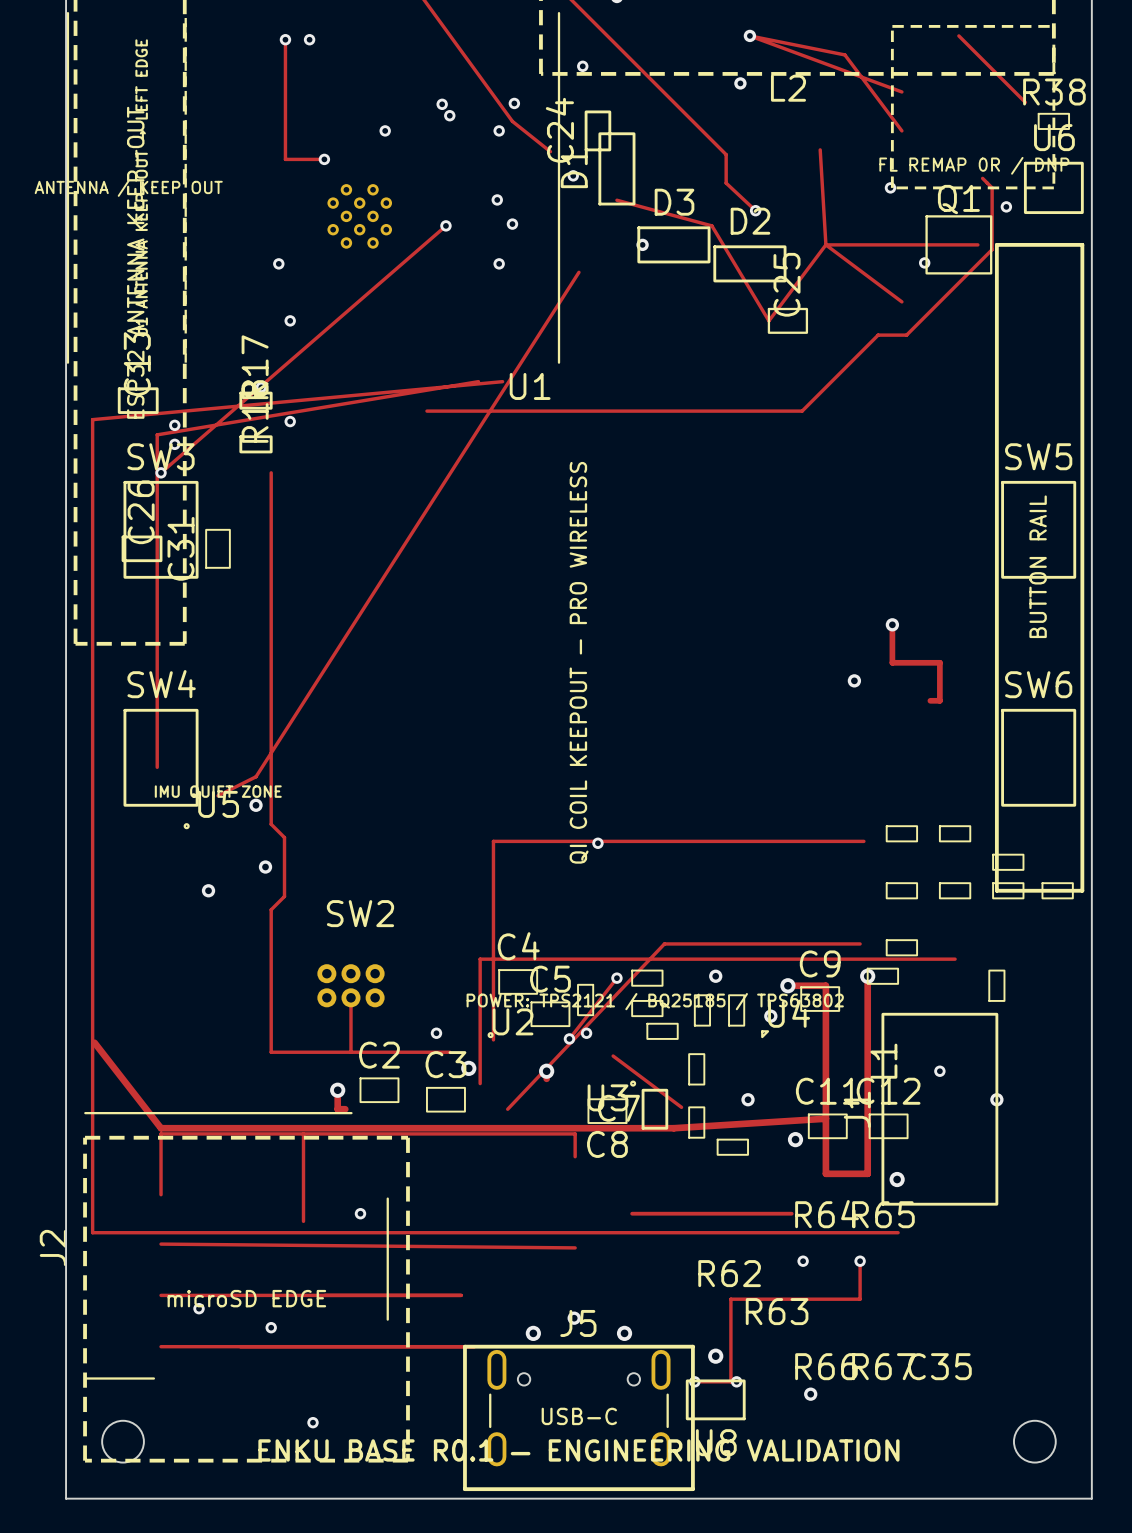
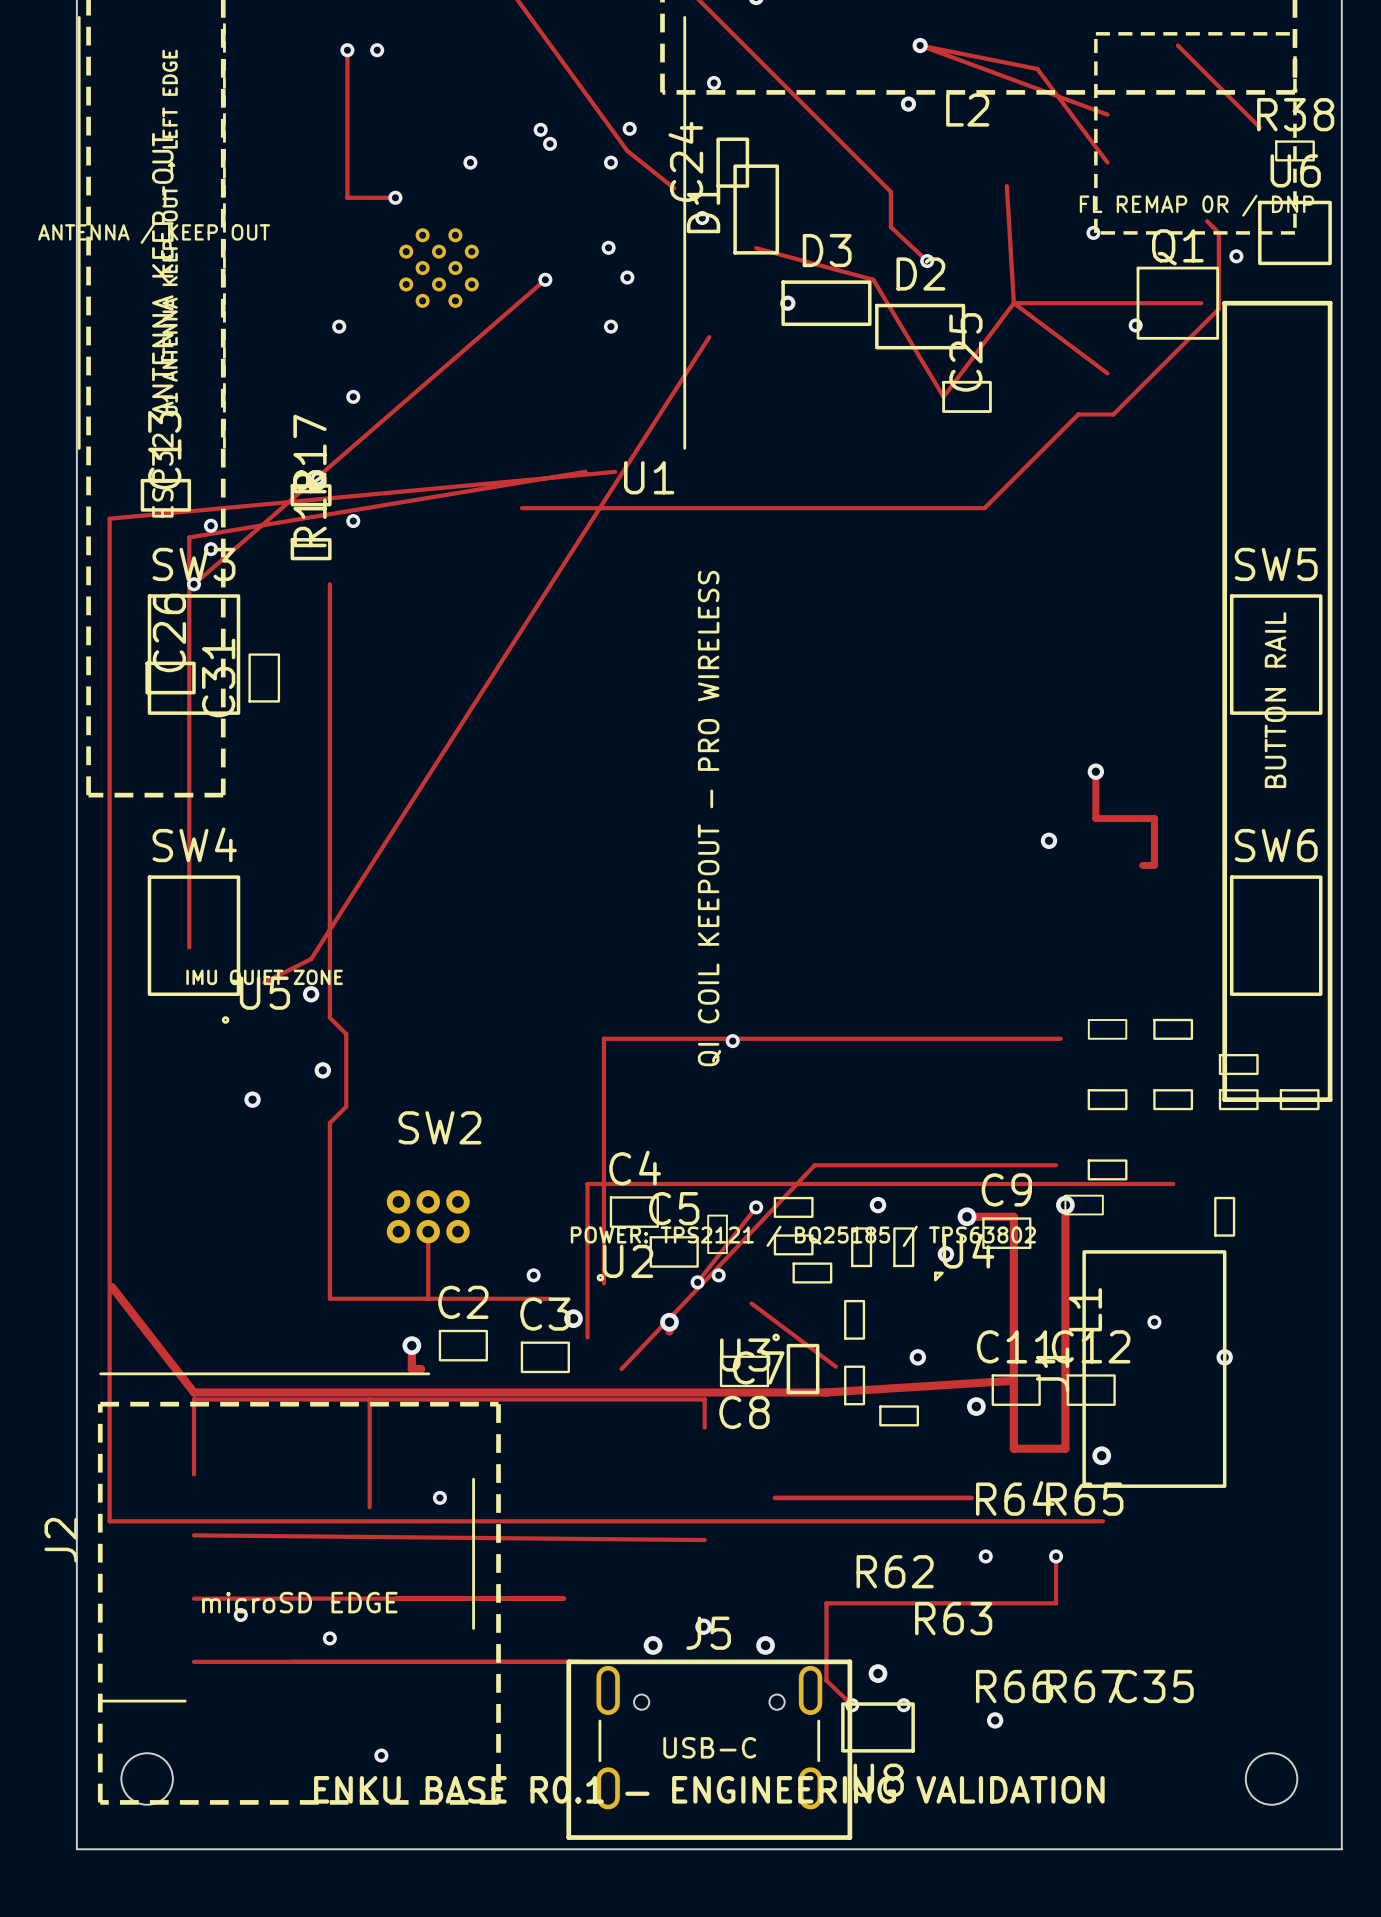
track: (730, 1299) (730, 1381) (694, 1381) -> (896, 1603) (826, 1603) (826, 1680) (852, 1705)

